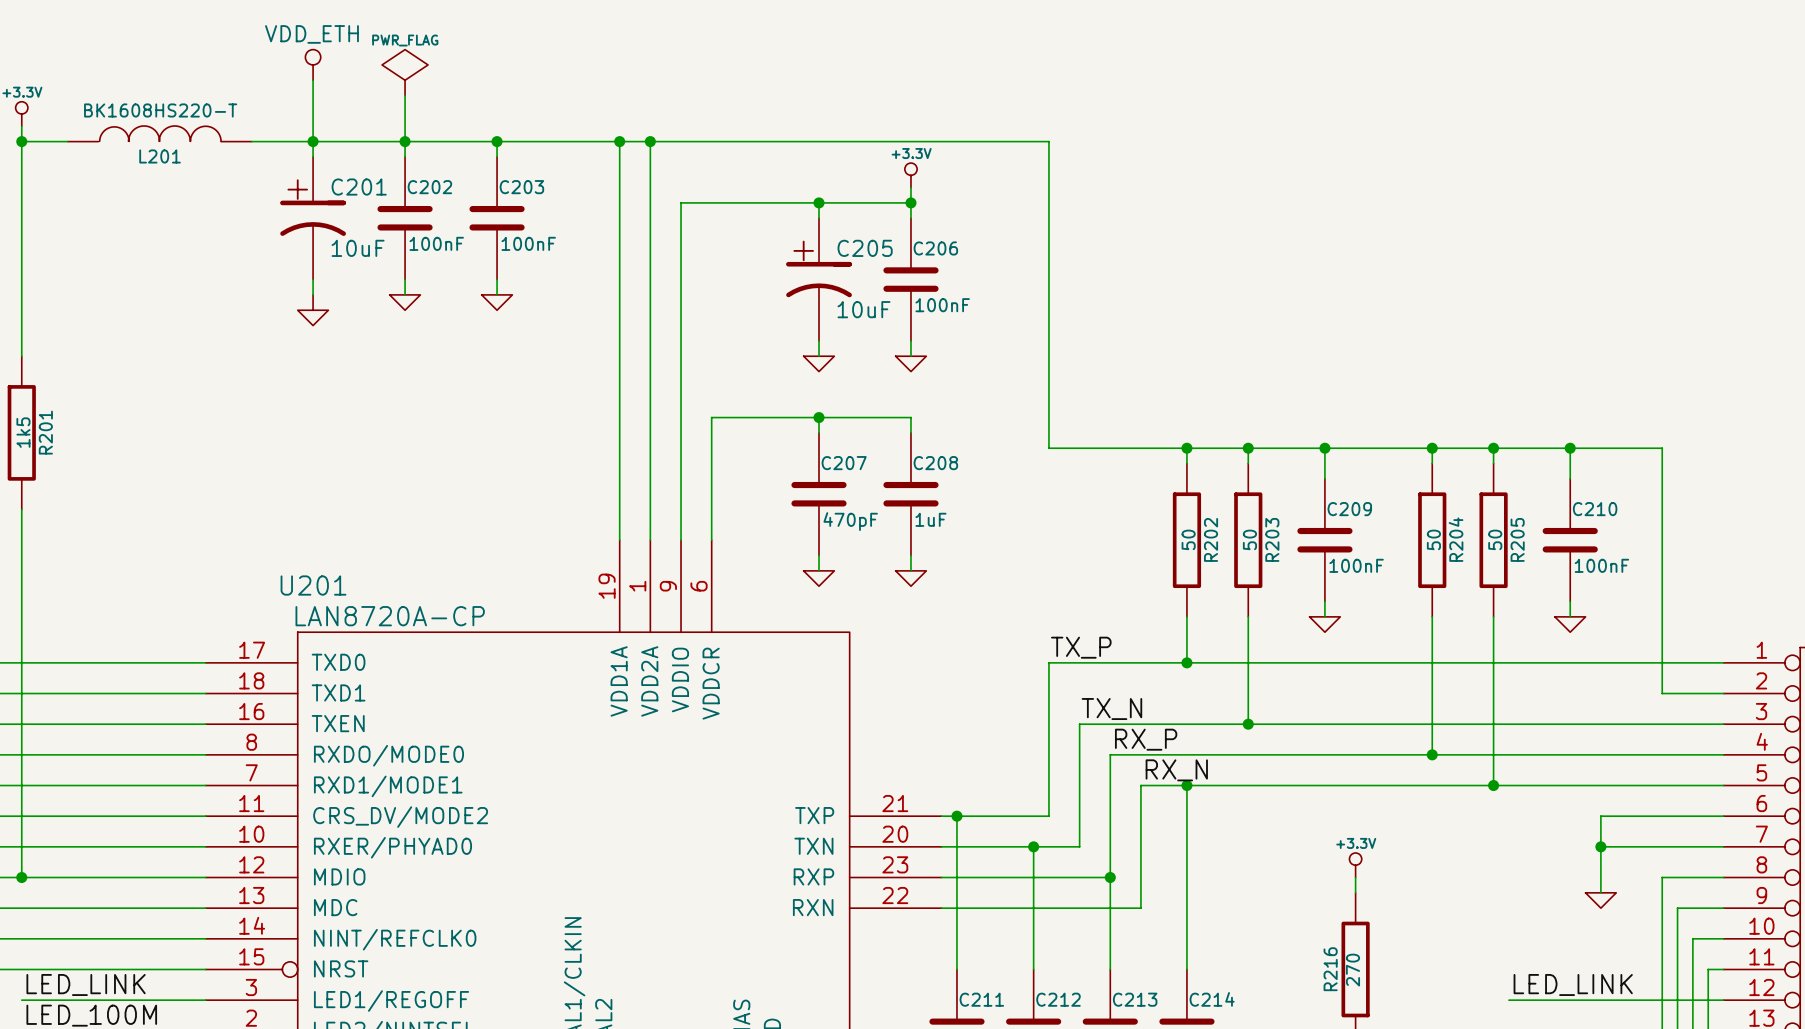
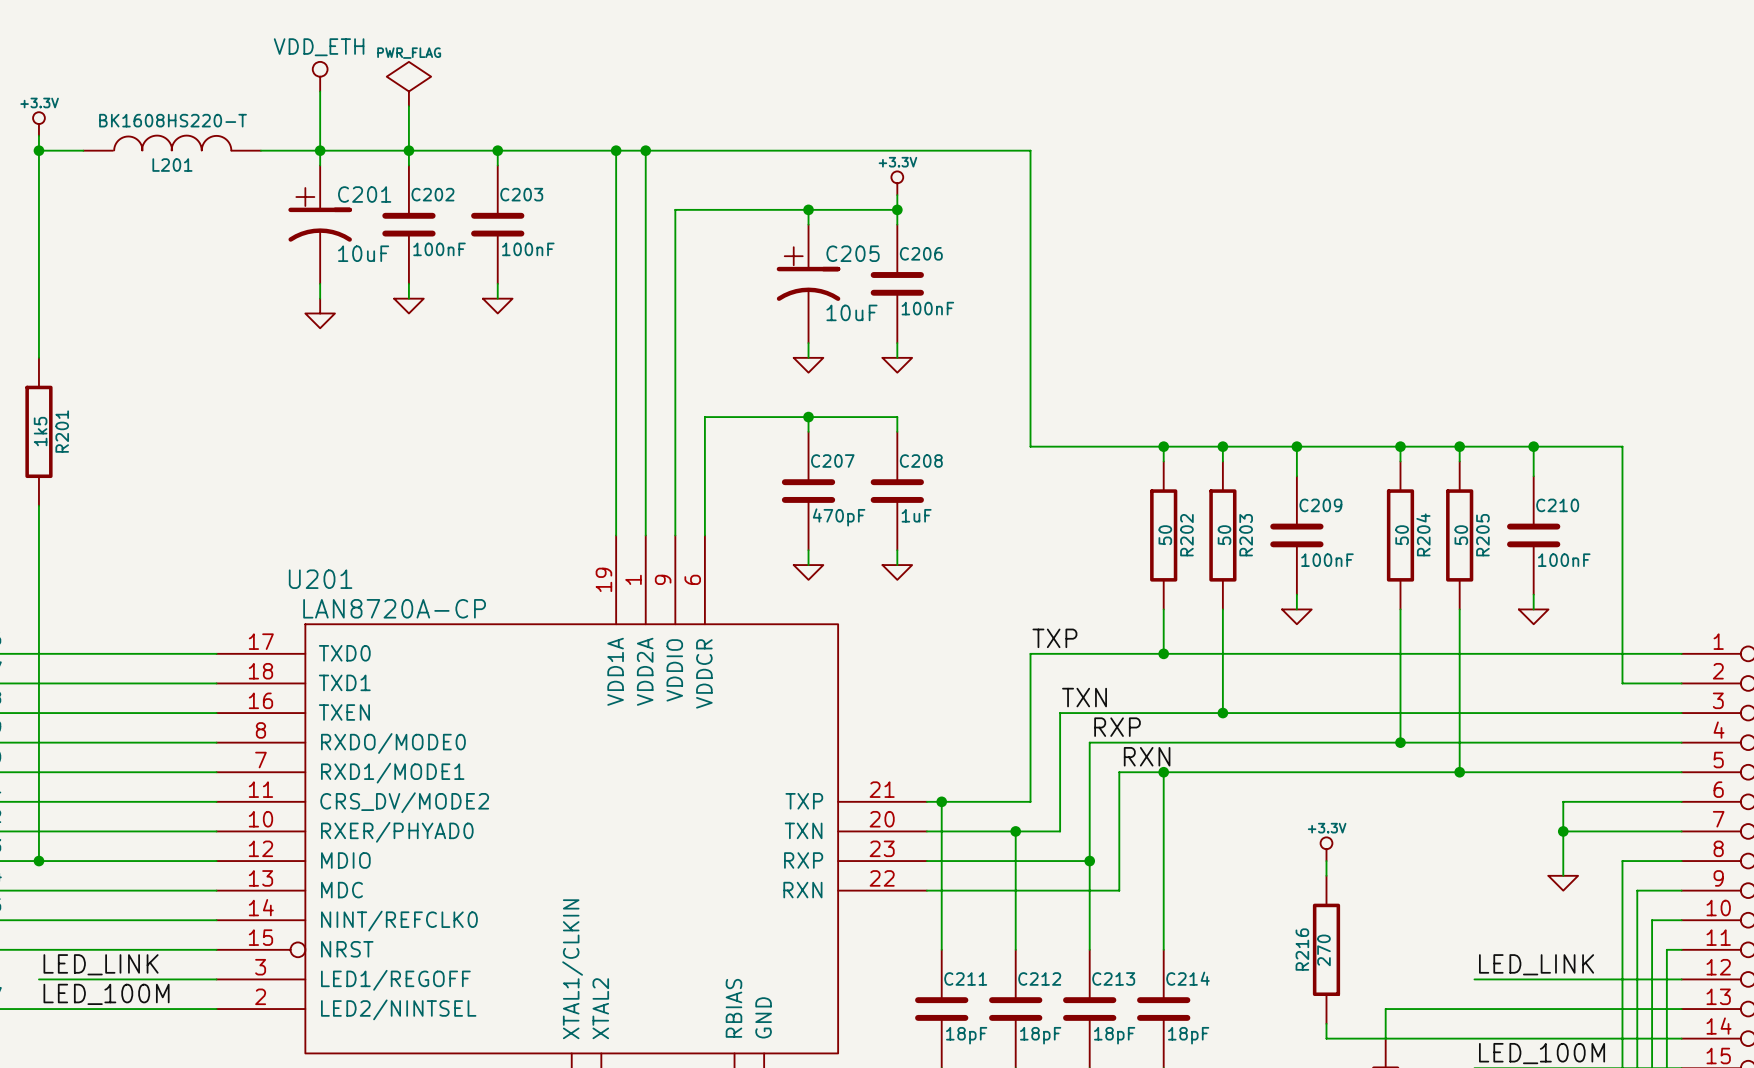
label: TX_P (1081, 647) -> TXP (1054, 638)
label: TX_N (1111, 709) -> TXN (1084, 697)
label: RX_P (1146, 739) -> RXP (1117, 727)
label: RX_N (1176, 770) -> RXN (1147, 756)

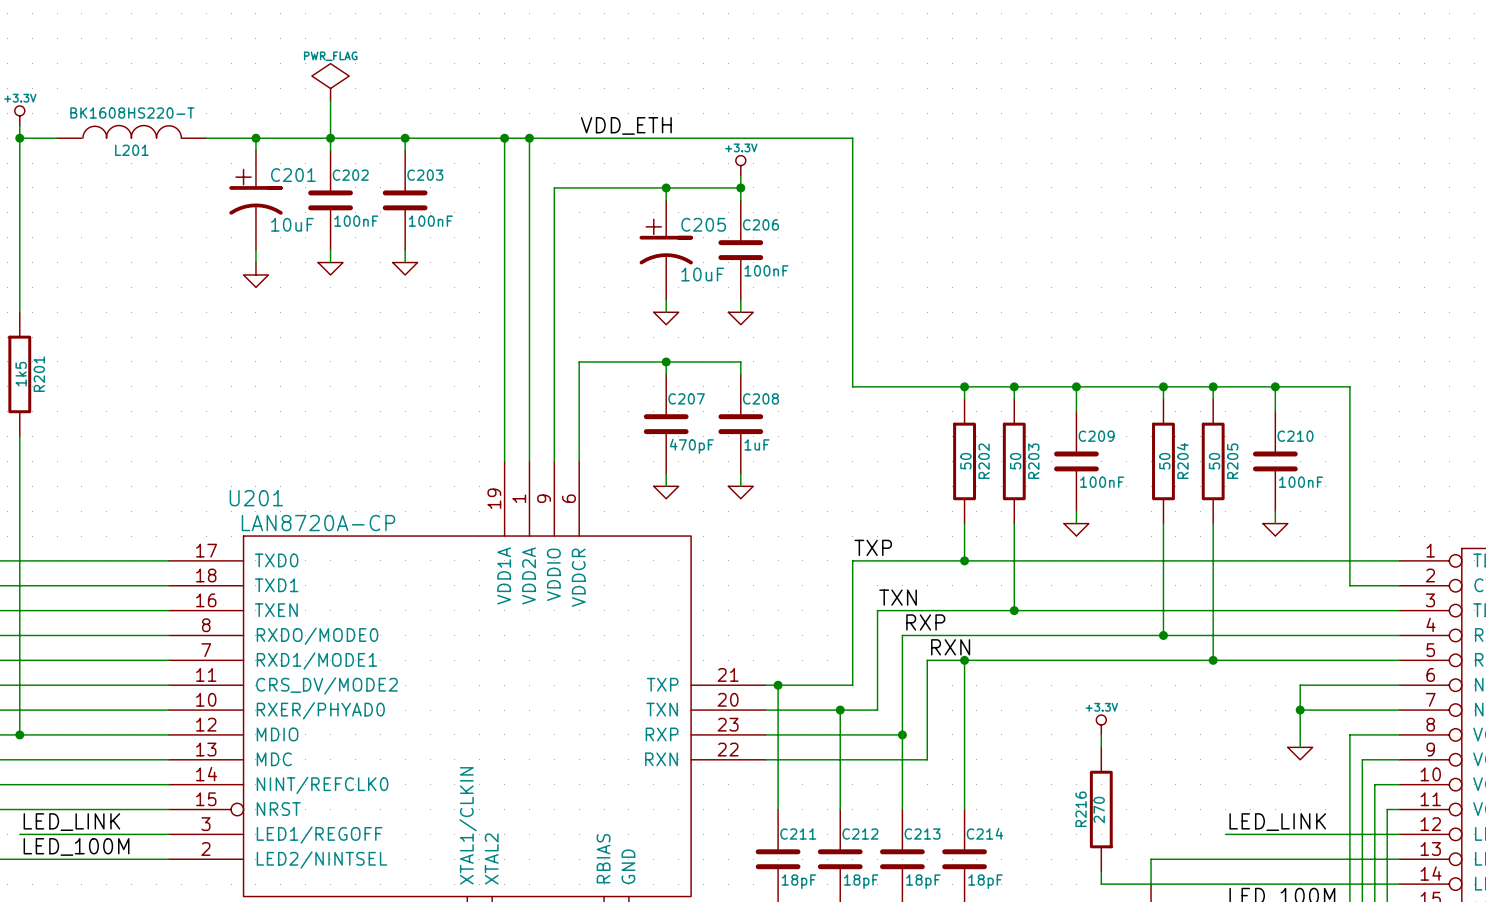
power symbol: VDD_ETH (320, 76) -> none
wire: (320, 91) (320, 150) -> none
label: none -> VDD_ETH (626, 125)

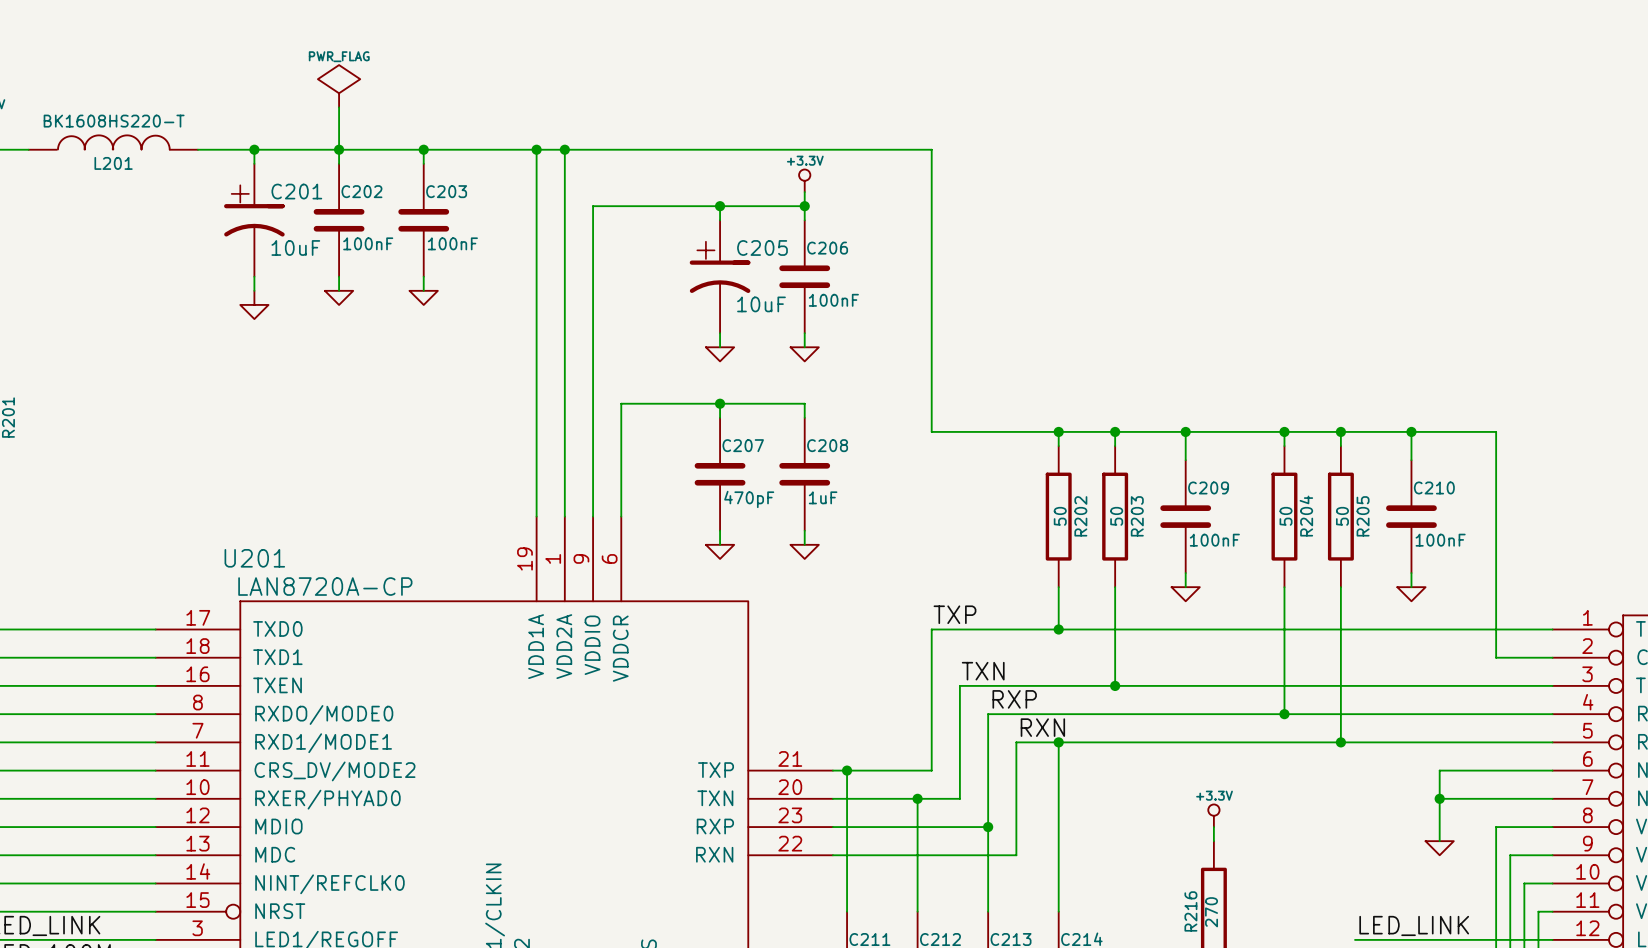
label: VDD_ETH (626, 125) -> none

